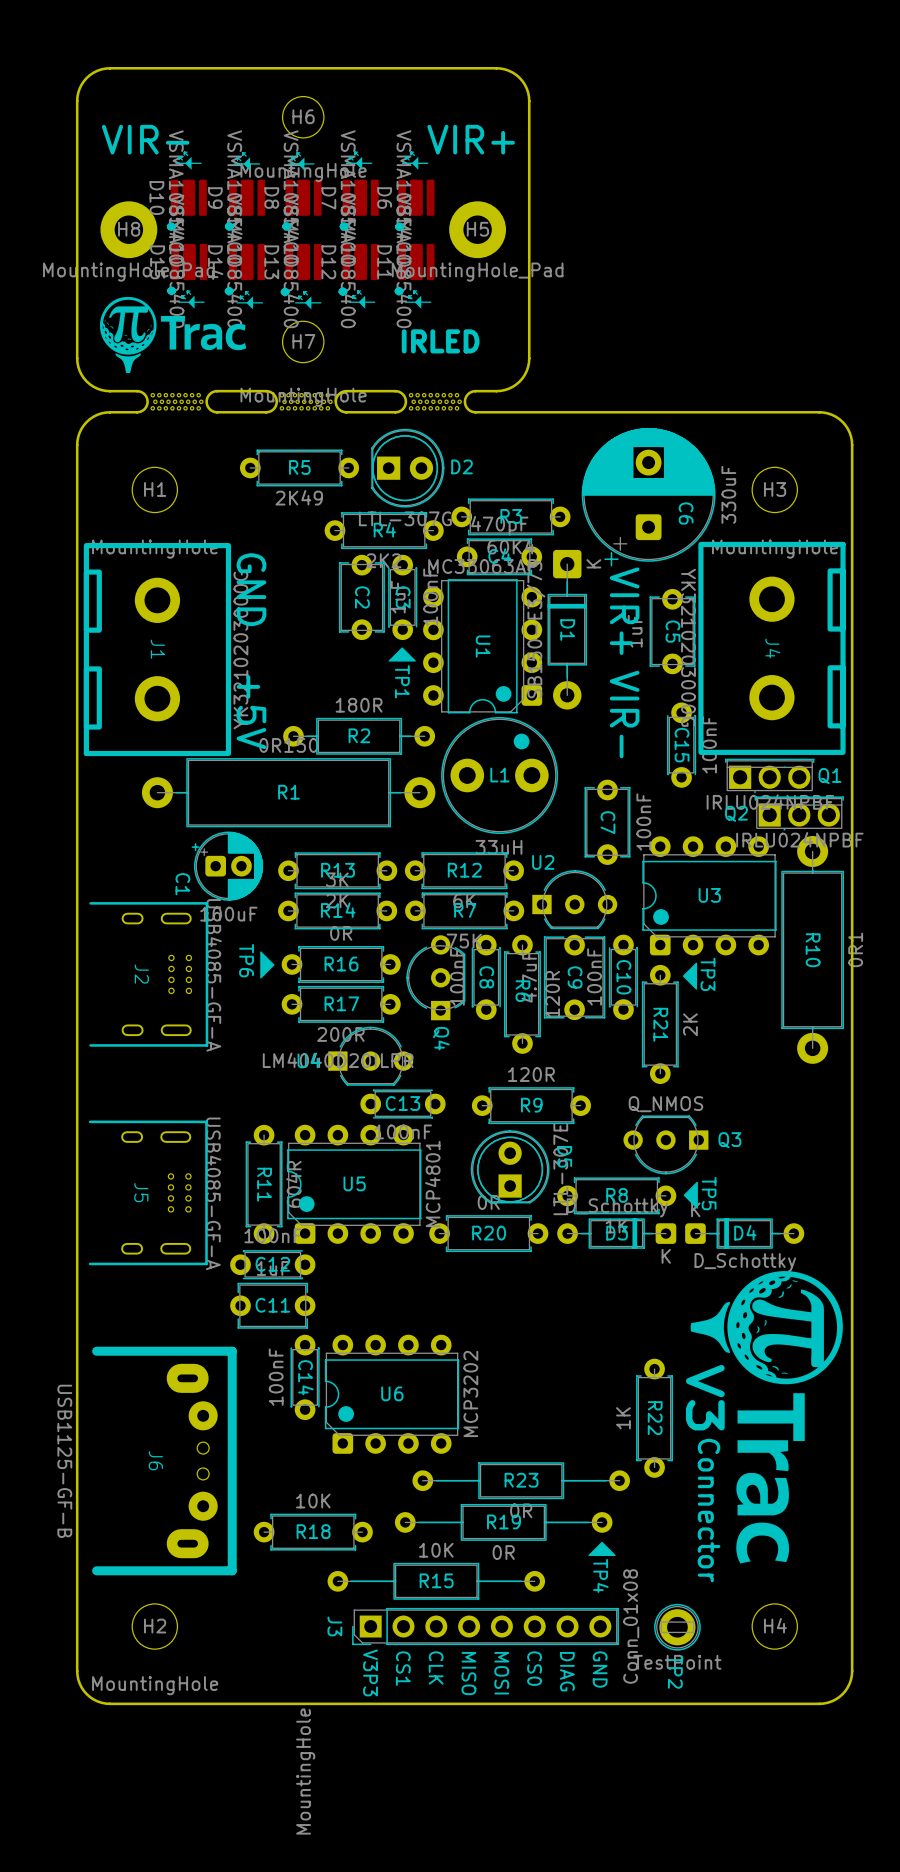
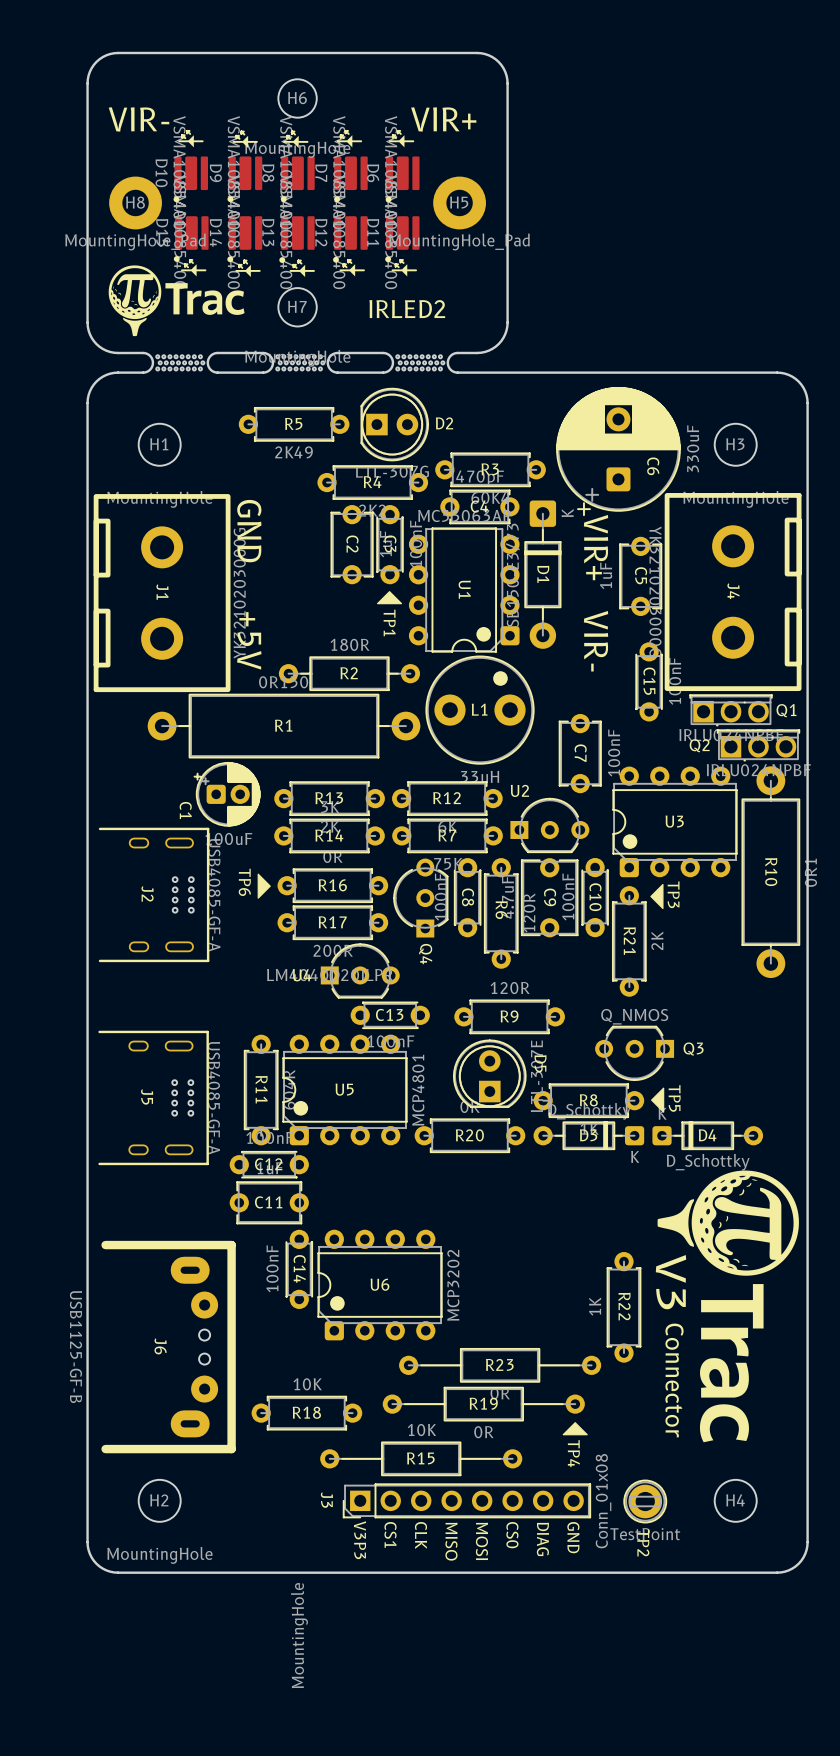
text: IRLED (440, 341) -> IRLED2 (407, 309)

